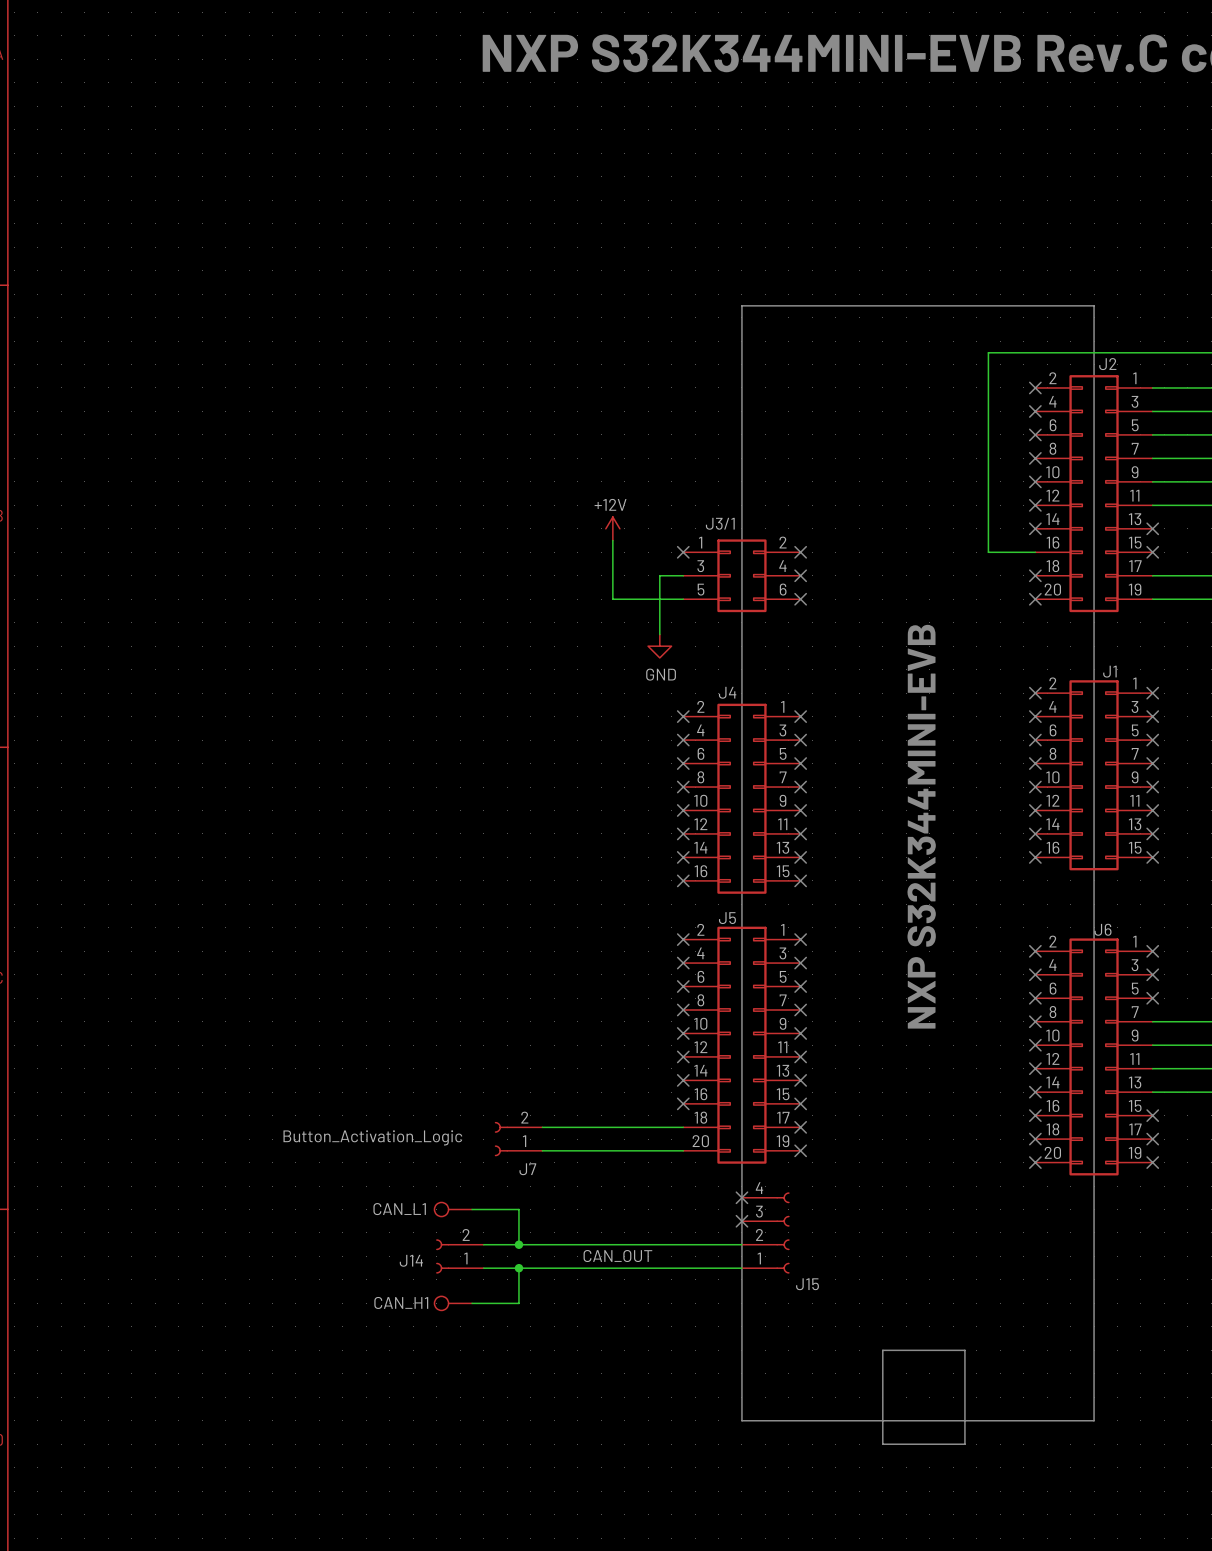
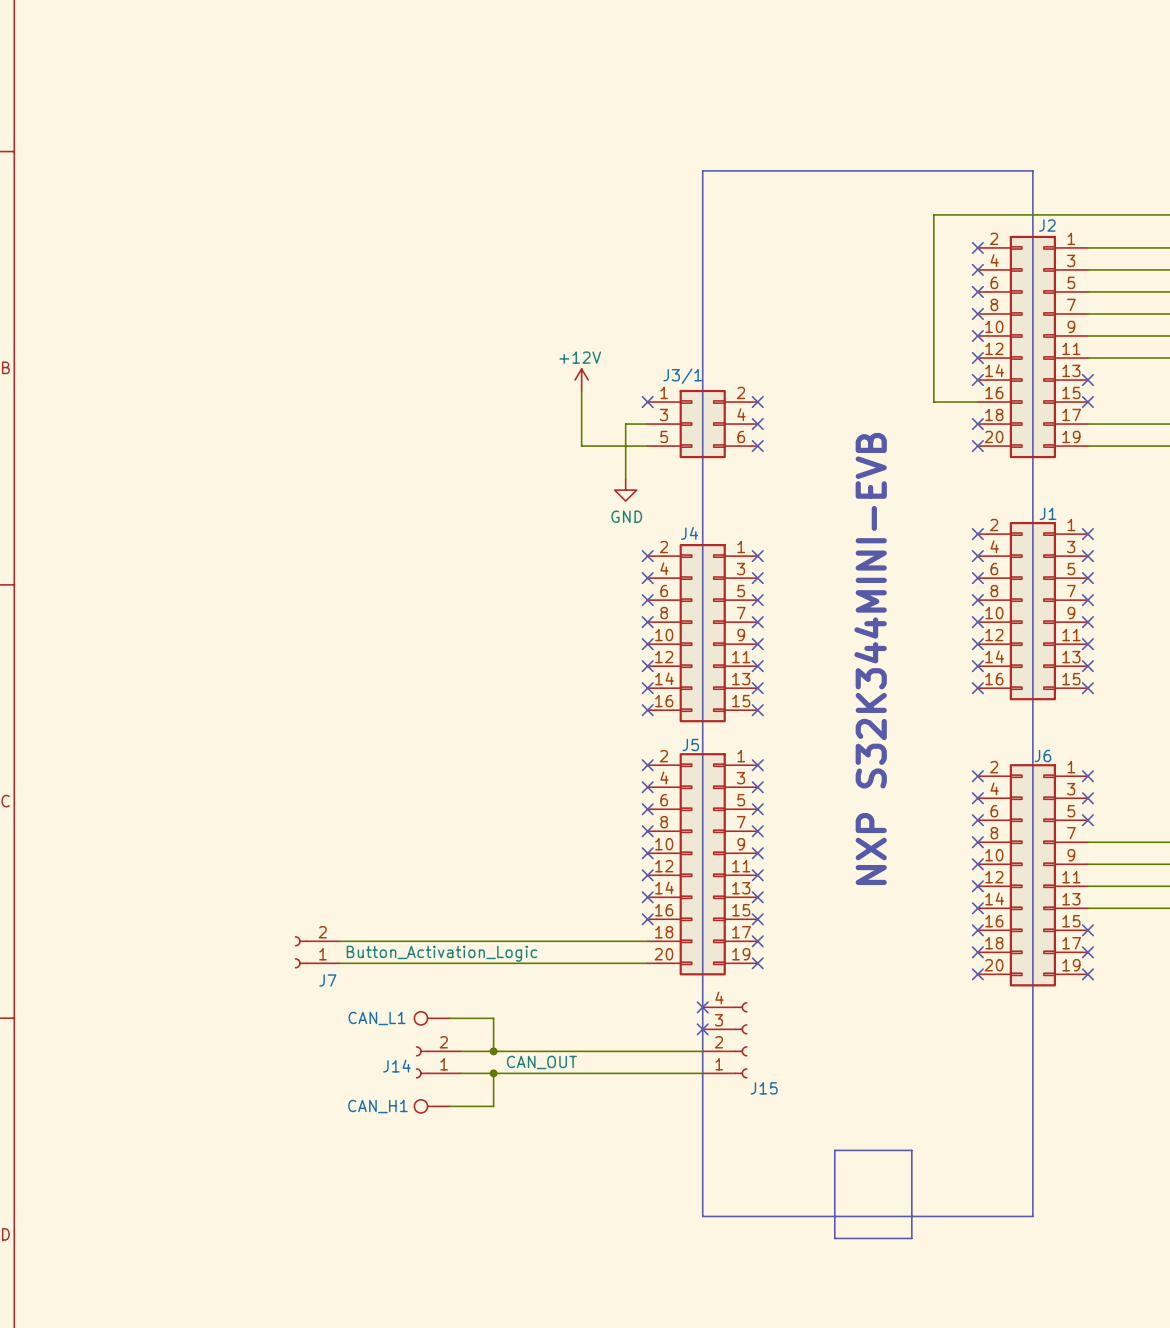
wire: none -> (339, 941) (515, 941)
J7 value position: Button_Activation_Logic (372, 1137) -> Button_Activation_Logic (442, 953)
J7 position: (518, 1139) -> (317, 952)
wire: none -> (339, 963) (515, 963)
J14 value position: CAN_OUT (617, 1256) -> CAN_OUT (541, 1062)

